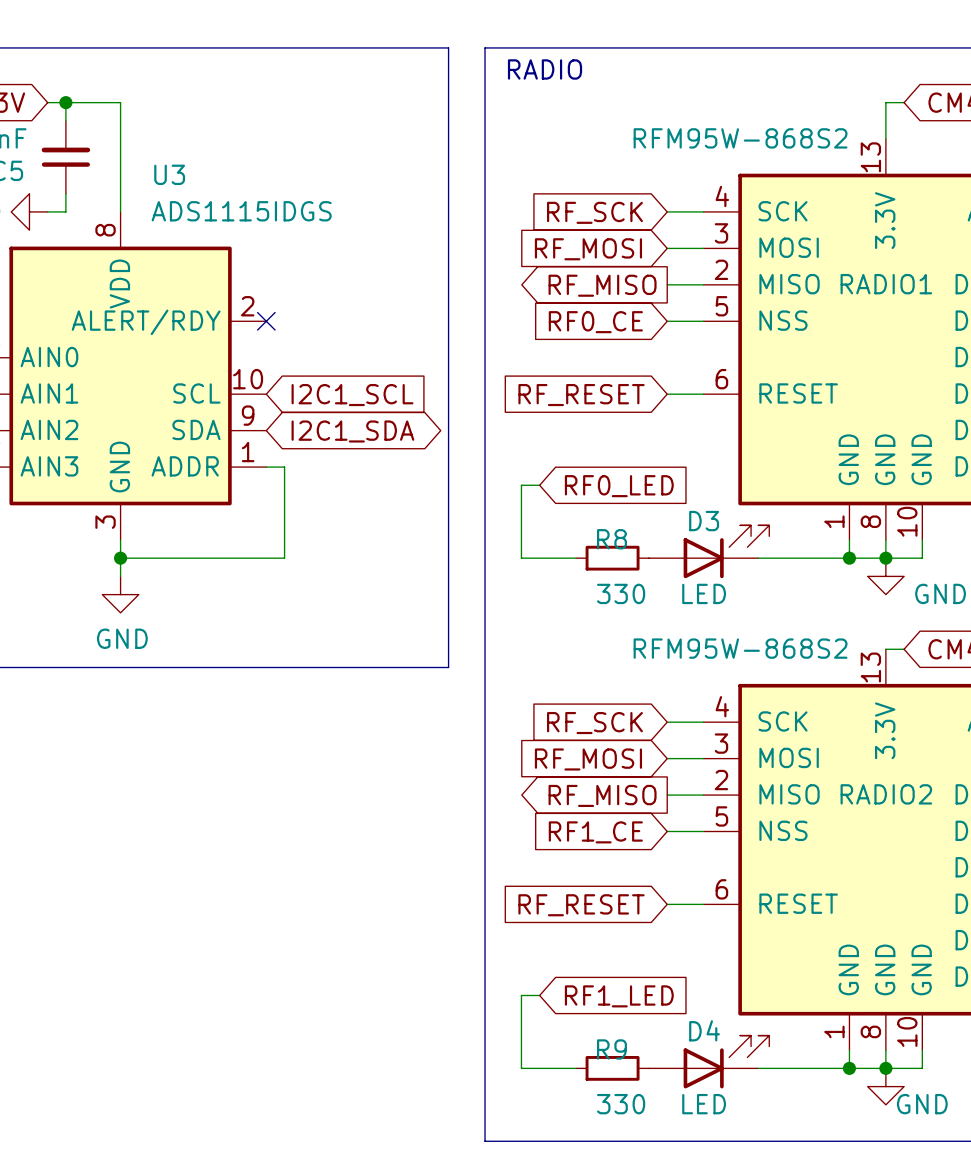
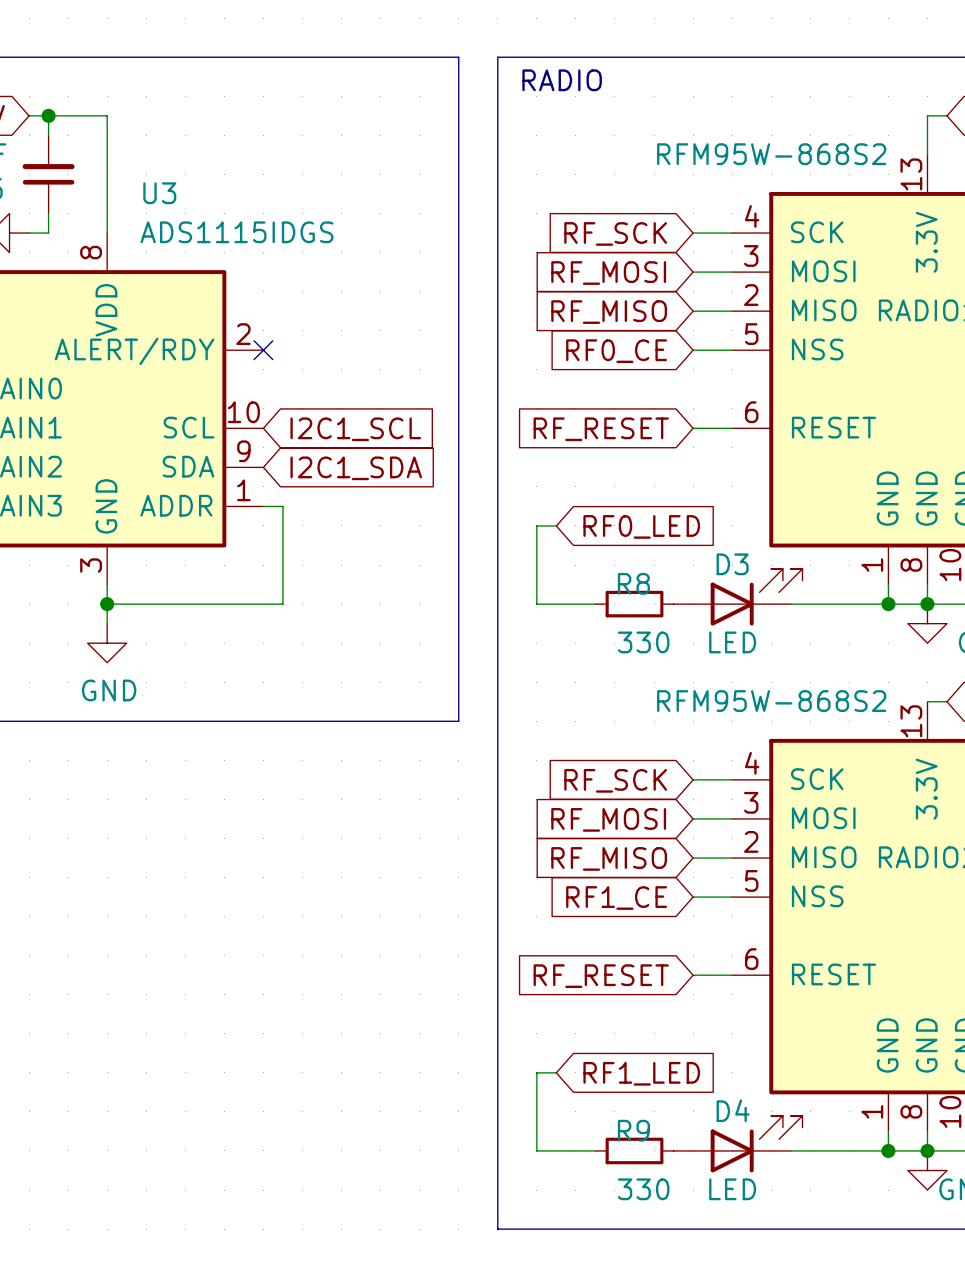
global label shape: output (602, 285) -> input (609, 312)
global label shape: bidirectional (352, 431) -> input (356, 468)
global label shape: output (602, 795) -> input (609, 858)

